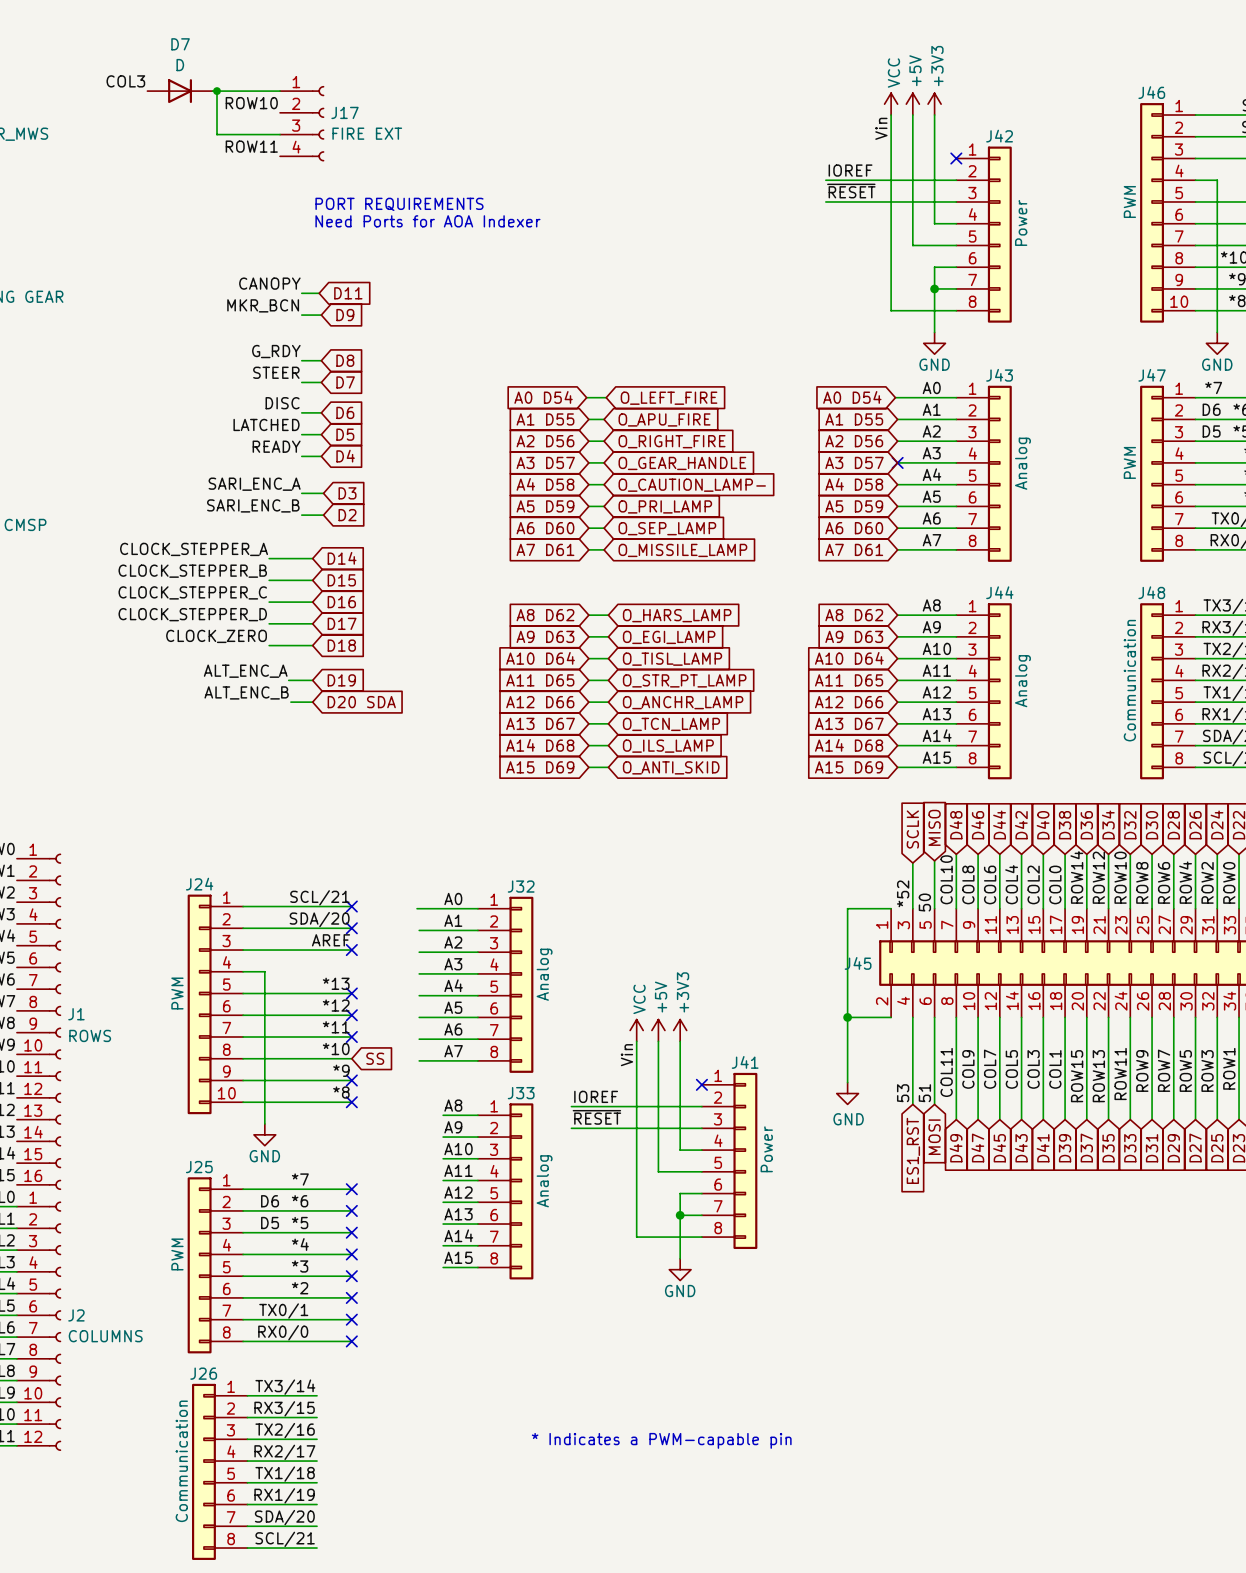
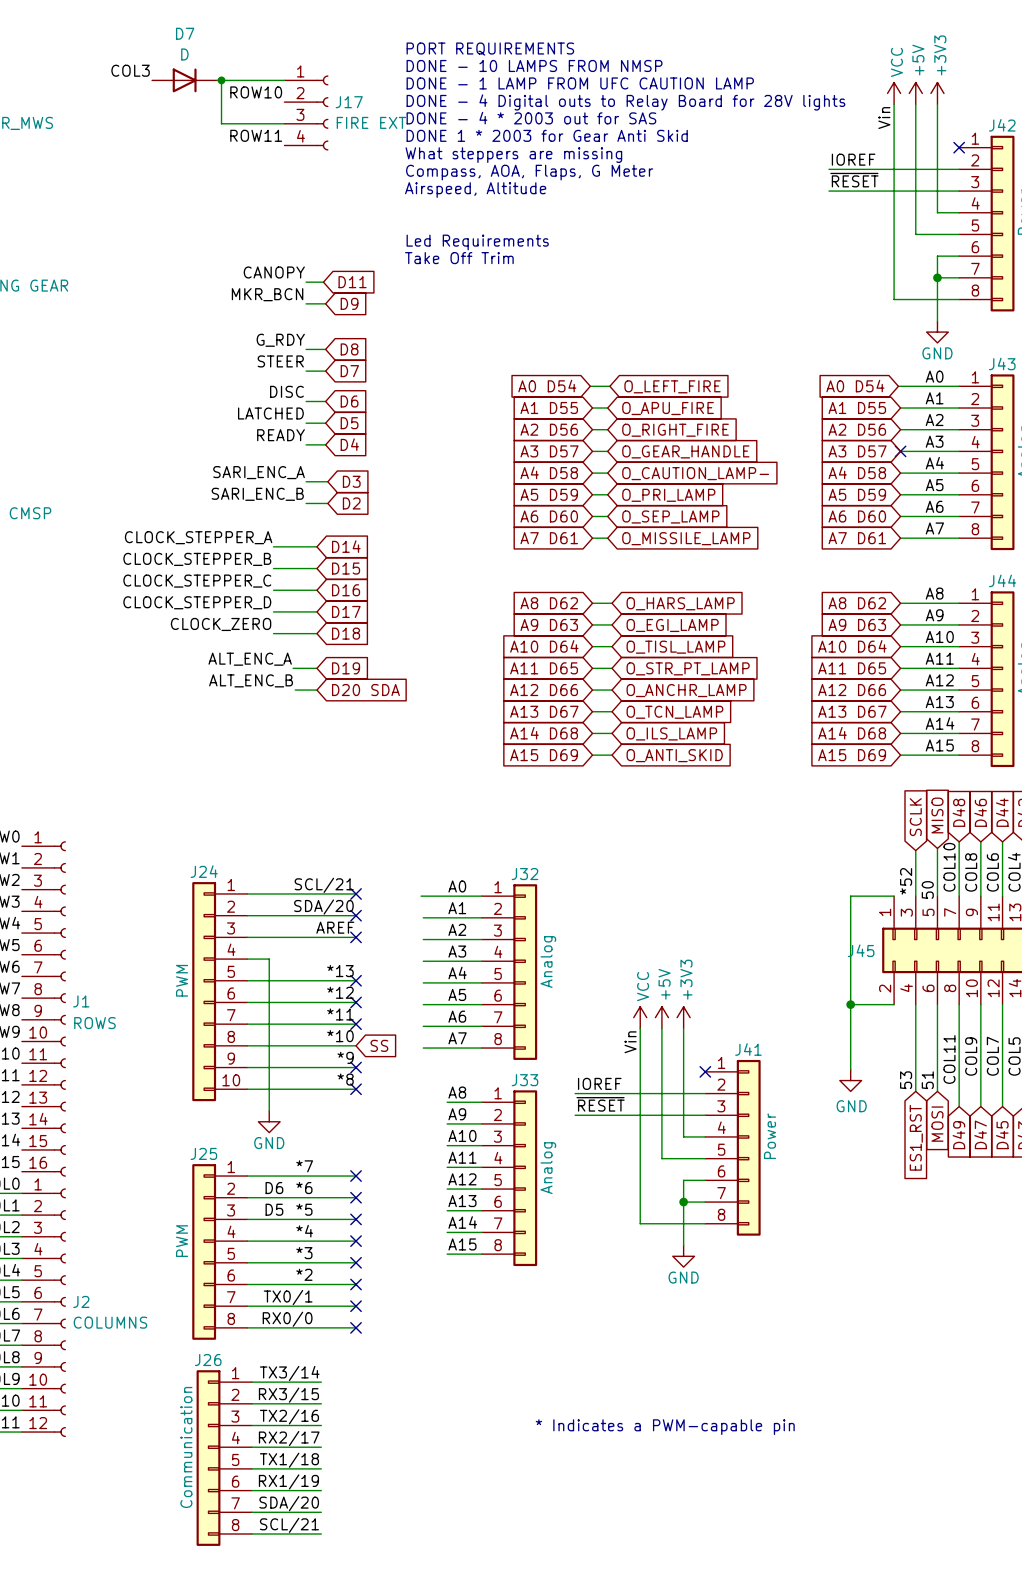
text: none -> DONE - 10 LAMPS FROM NMSP (534, 65)
text: none -> DONE - 1 LAMP FROM UFC CAUTION LAMP (580, 83)
text: none -> DONE - 4 Digital outs to Relay Board for 28V lights (625, 102)
text: none -> DONE - 4 * 2003 out for SAS (531, 118)
text: none -> DONE 1 * 2003 for Gear Anti Skid (547, 135)
text: none -> What steppers are missing (513, 155)
text: none -> Compass, AOA, Flaps, G Meter (529, 172)
text: none -> Airspeed, Altitude (475, 190)
text position: PORT REQUIREMENTS (399, 204) -> PORT REQUIREMENTS (490, 49)
text: Need Ports for AOA Indexer (427, 221) -> none
text: none -> Led Requirements (477, 242)
text: none -> Take Off Trim (459, 258)

